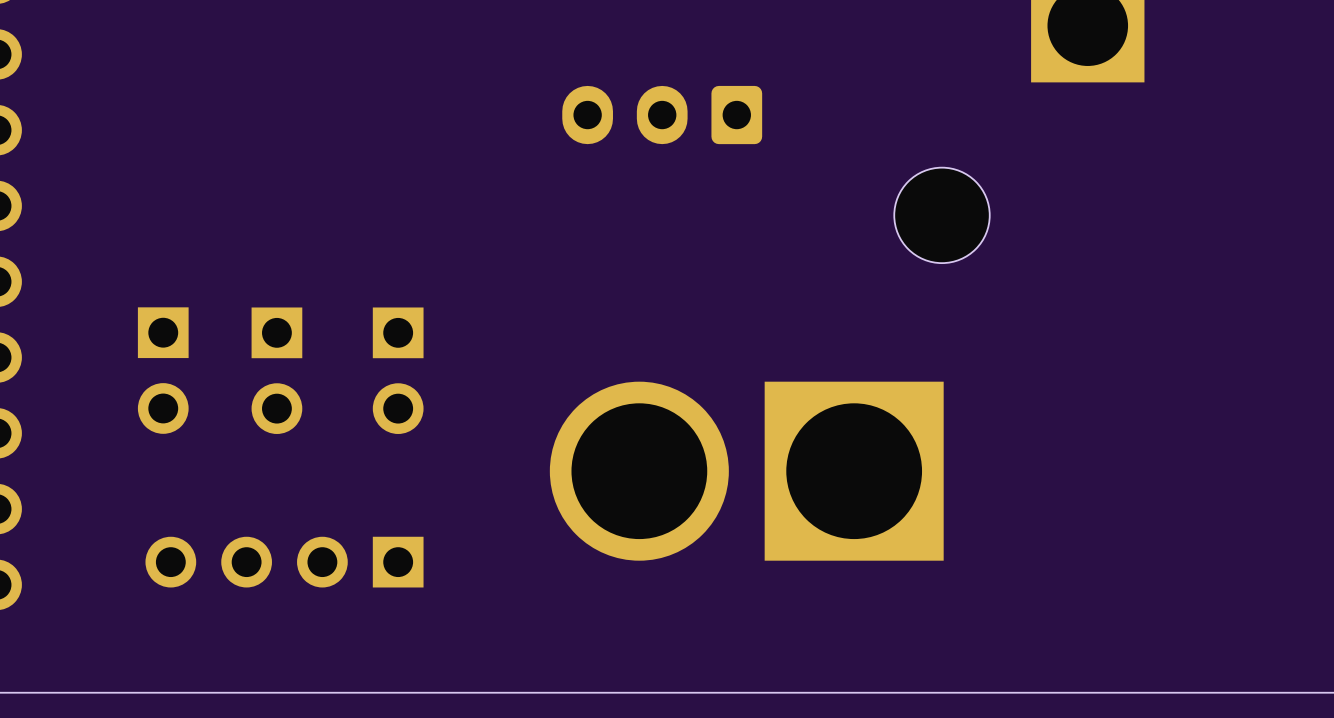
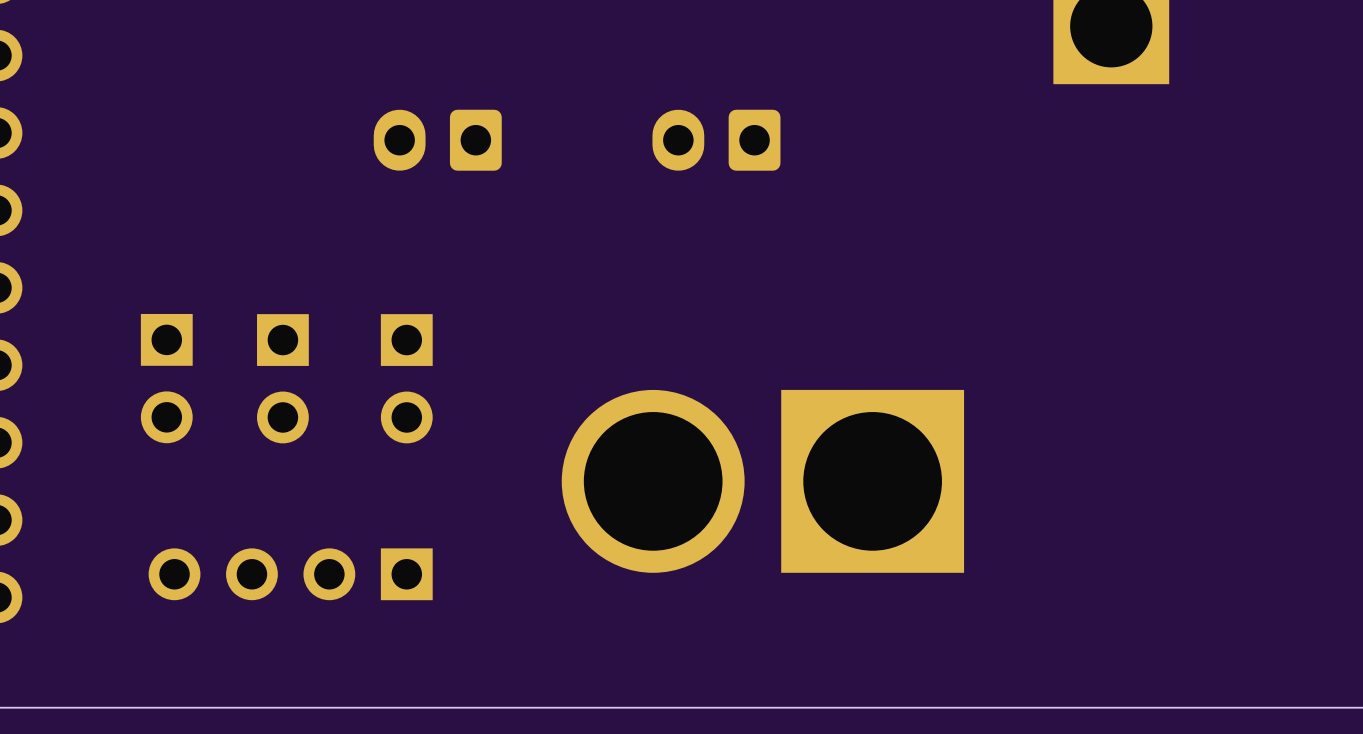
part: (662, 115) -> none
part: none -> (437, 140)
part: none -> (716, 140)
part: (942, 215) -> none

